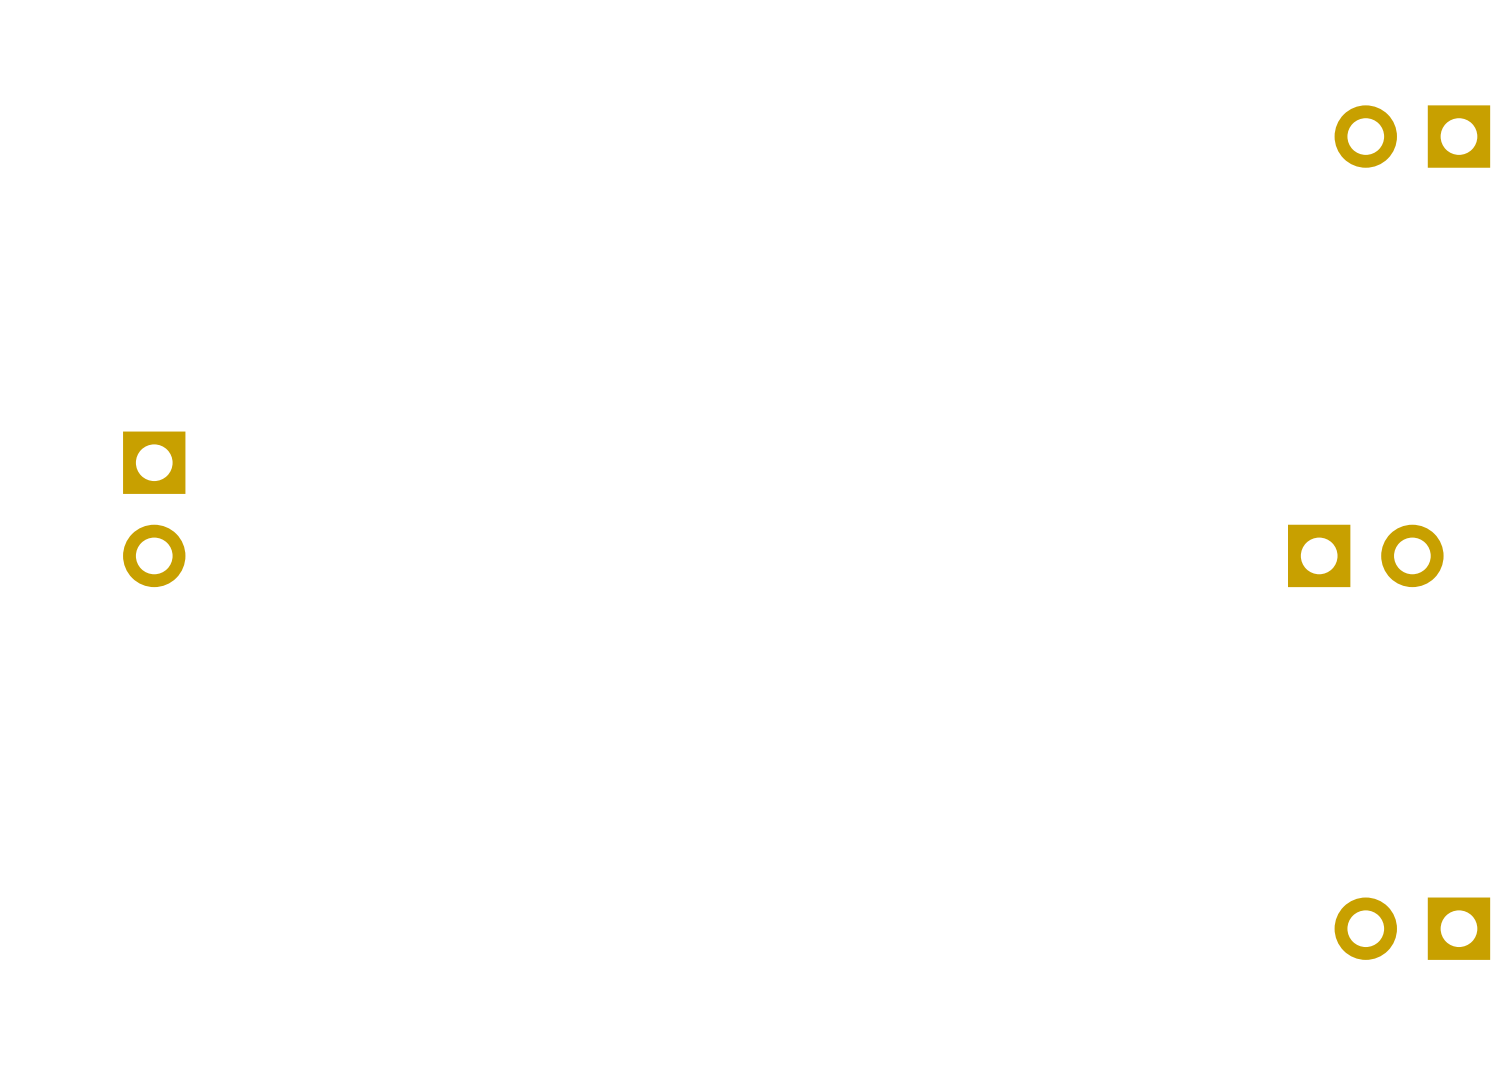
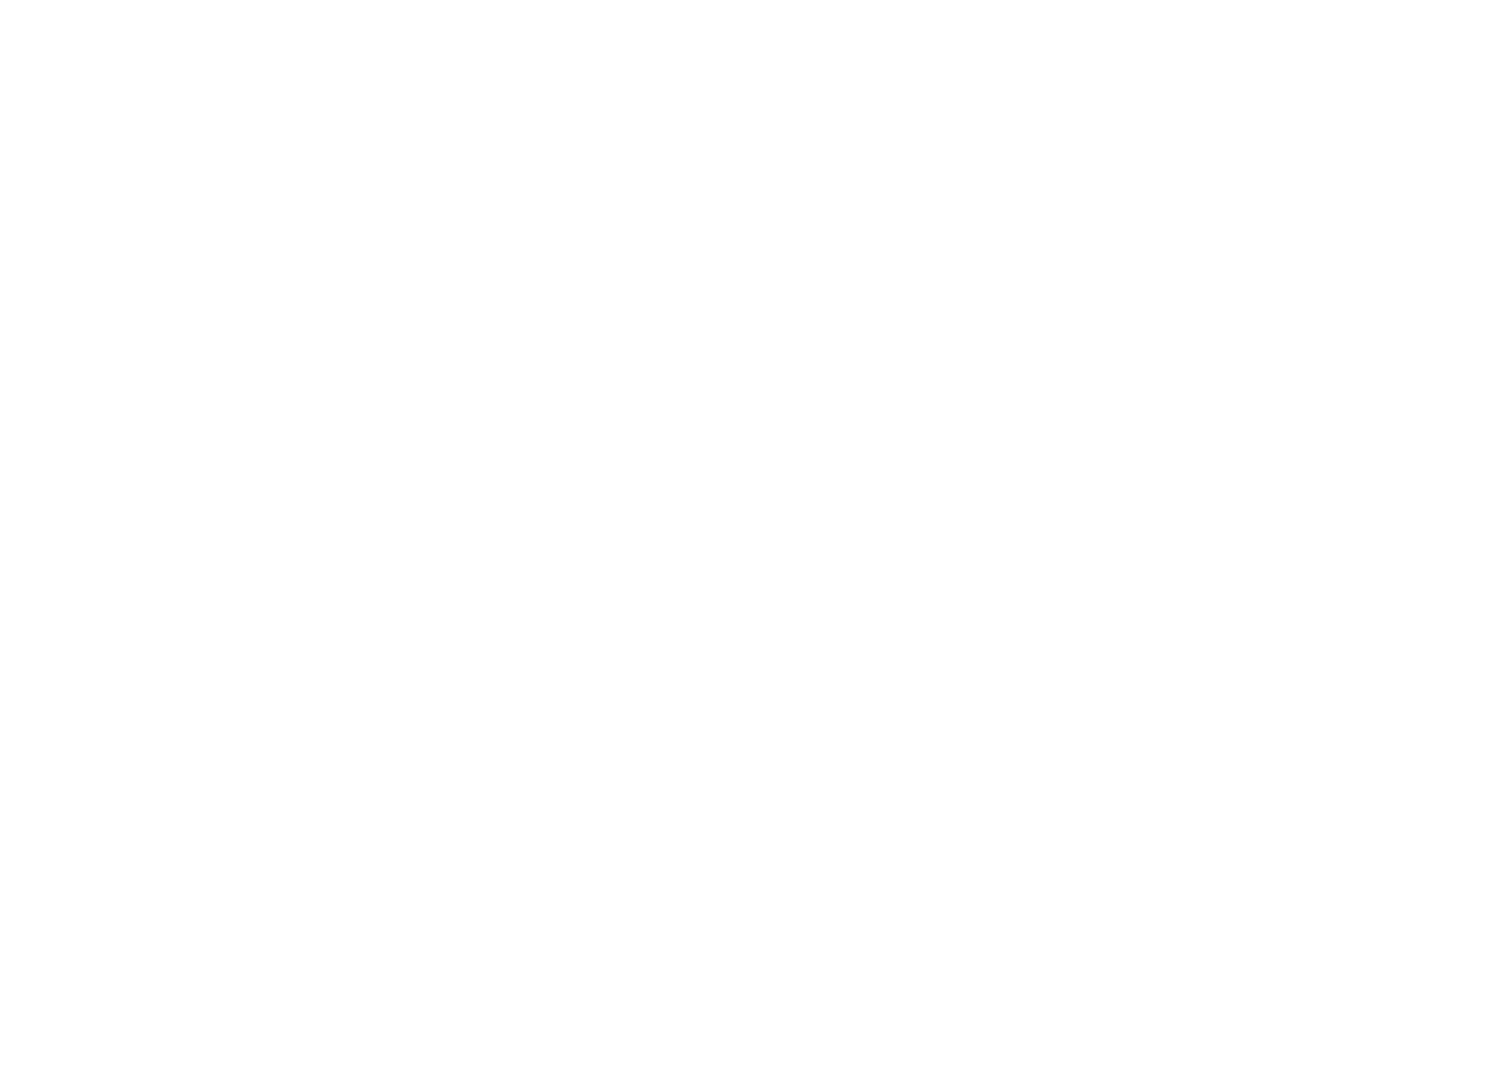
part: (1412, 136) -> none
part: (154, 509) -> none
part: (1365, 555) -> none
part: (1412, 928) -> none

